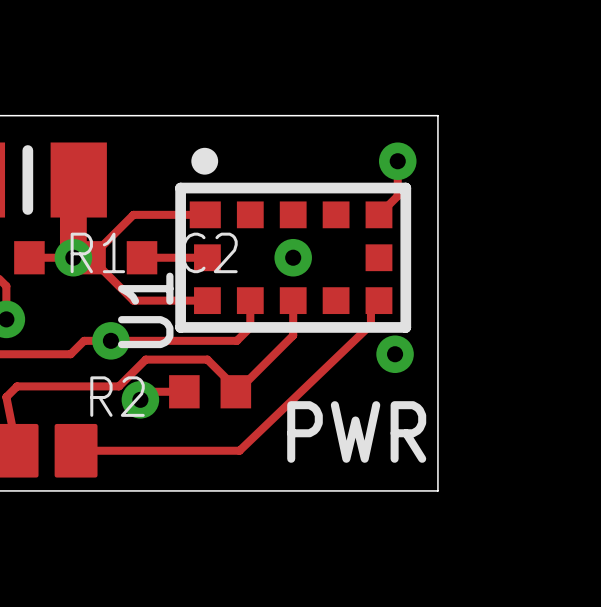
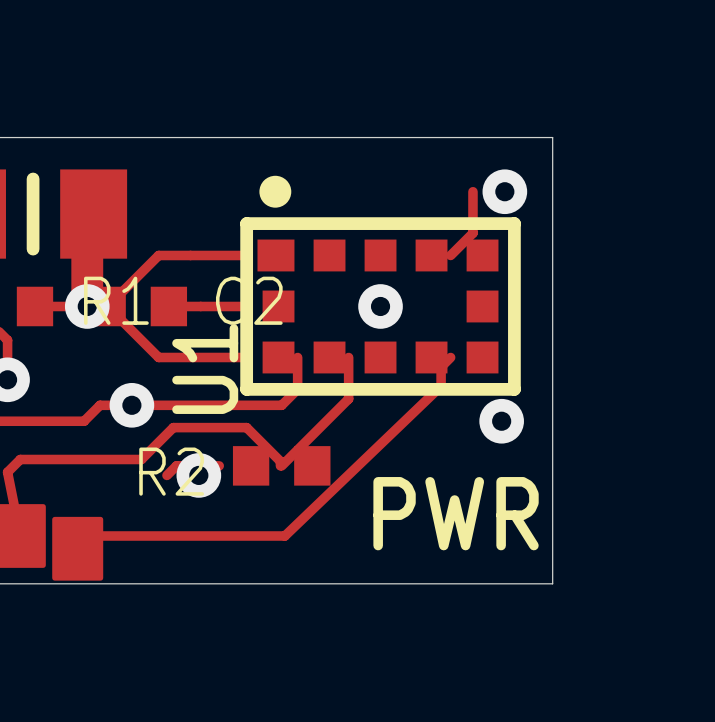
board edge: (437, 115) (437, 490) -> (520, 137) (552, 137) (552, 583) (520, 583)
drawing position: (204, 161) -> (275, 191)
via position: (397, 161) -> (504, 191)
U1 position: (293, 257) -> (380, 306)
via position: (293, 257) -> (380, 306)
via position: (395, 354) -> (501, 421)
R2 position: (210, 391) -> (281, 465)
via position: (140, 399) -> (198, 475)
text position: PWR (356, 431) -> PWR (456, 513)
part position: (76, 450) -> (77, 548)

